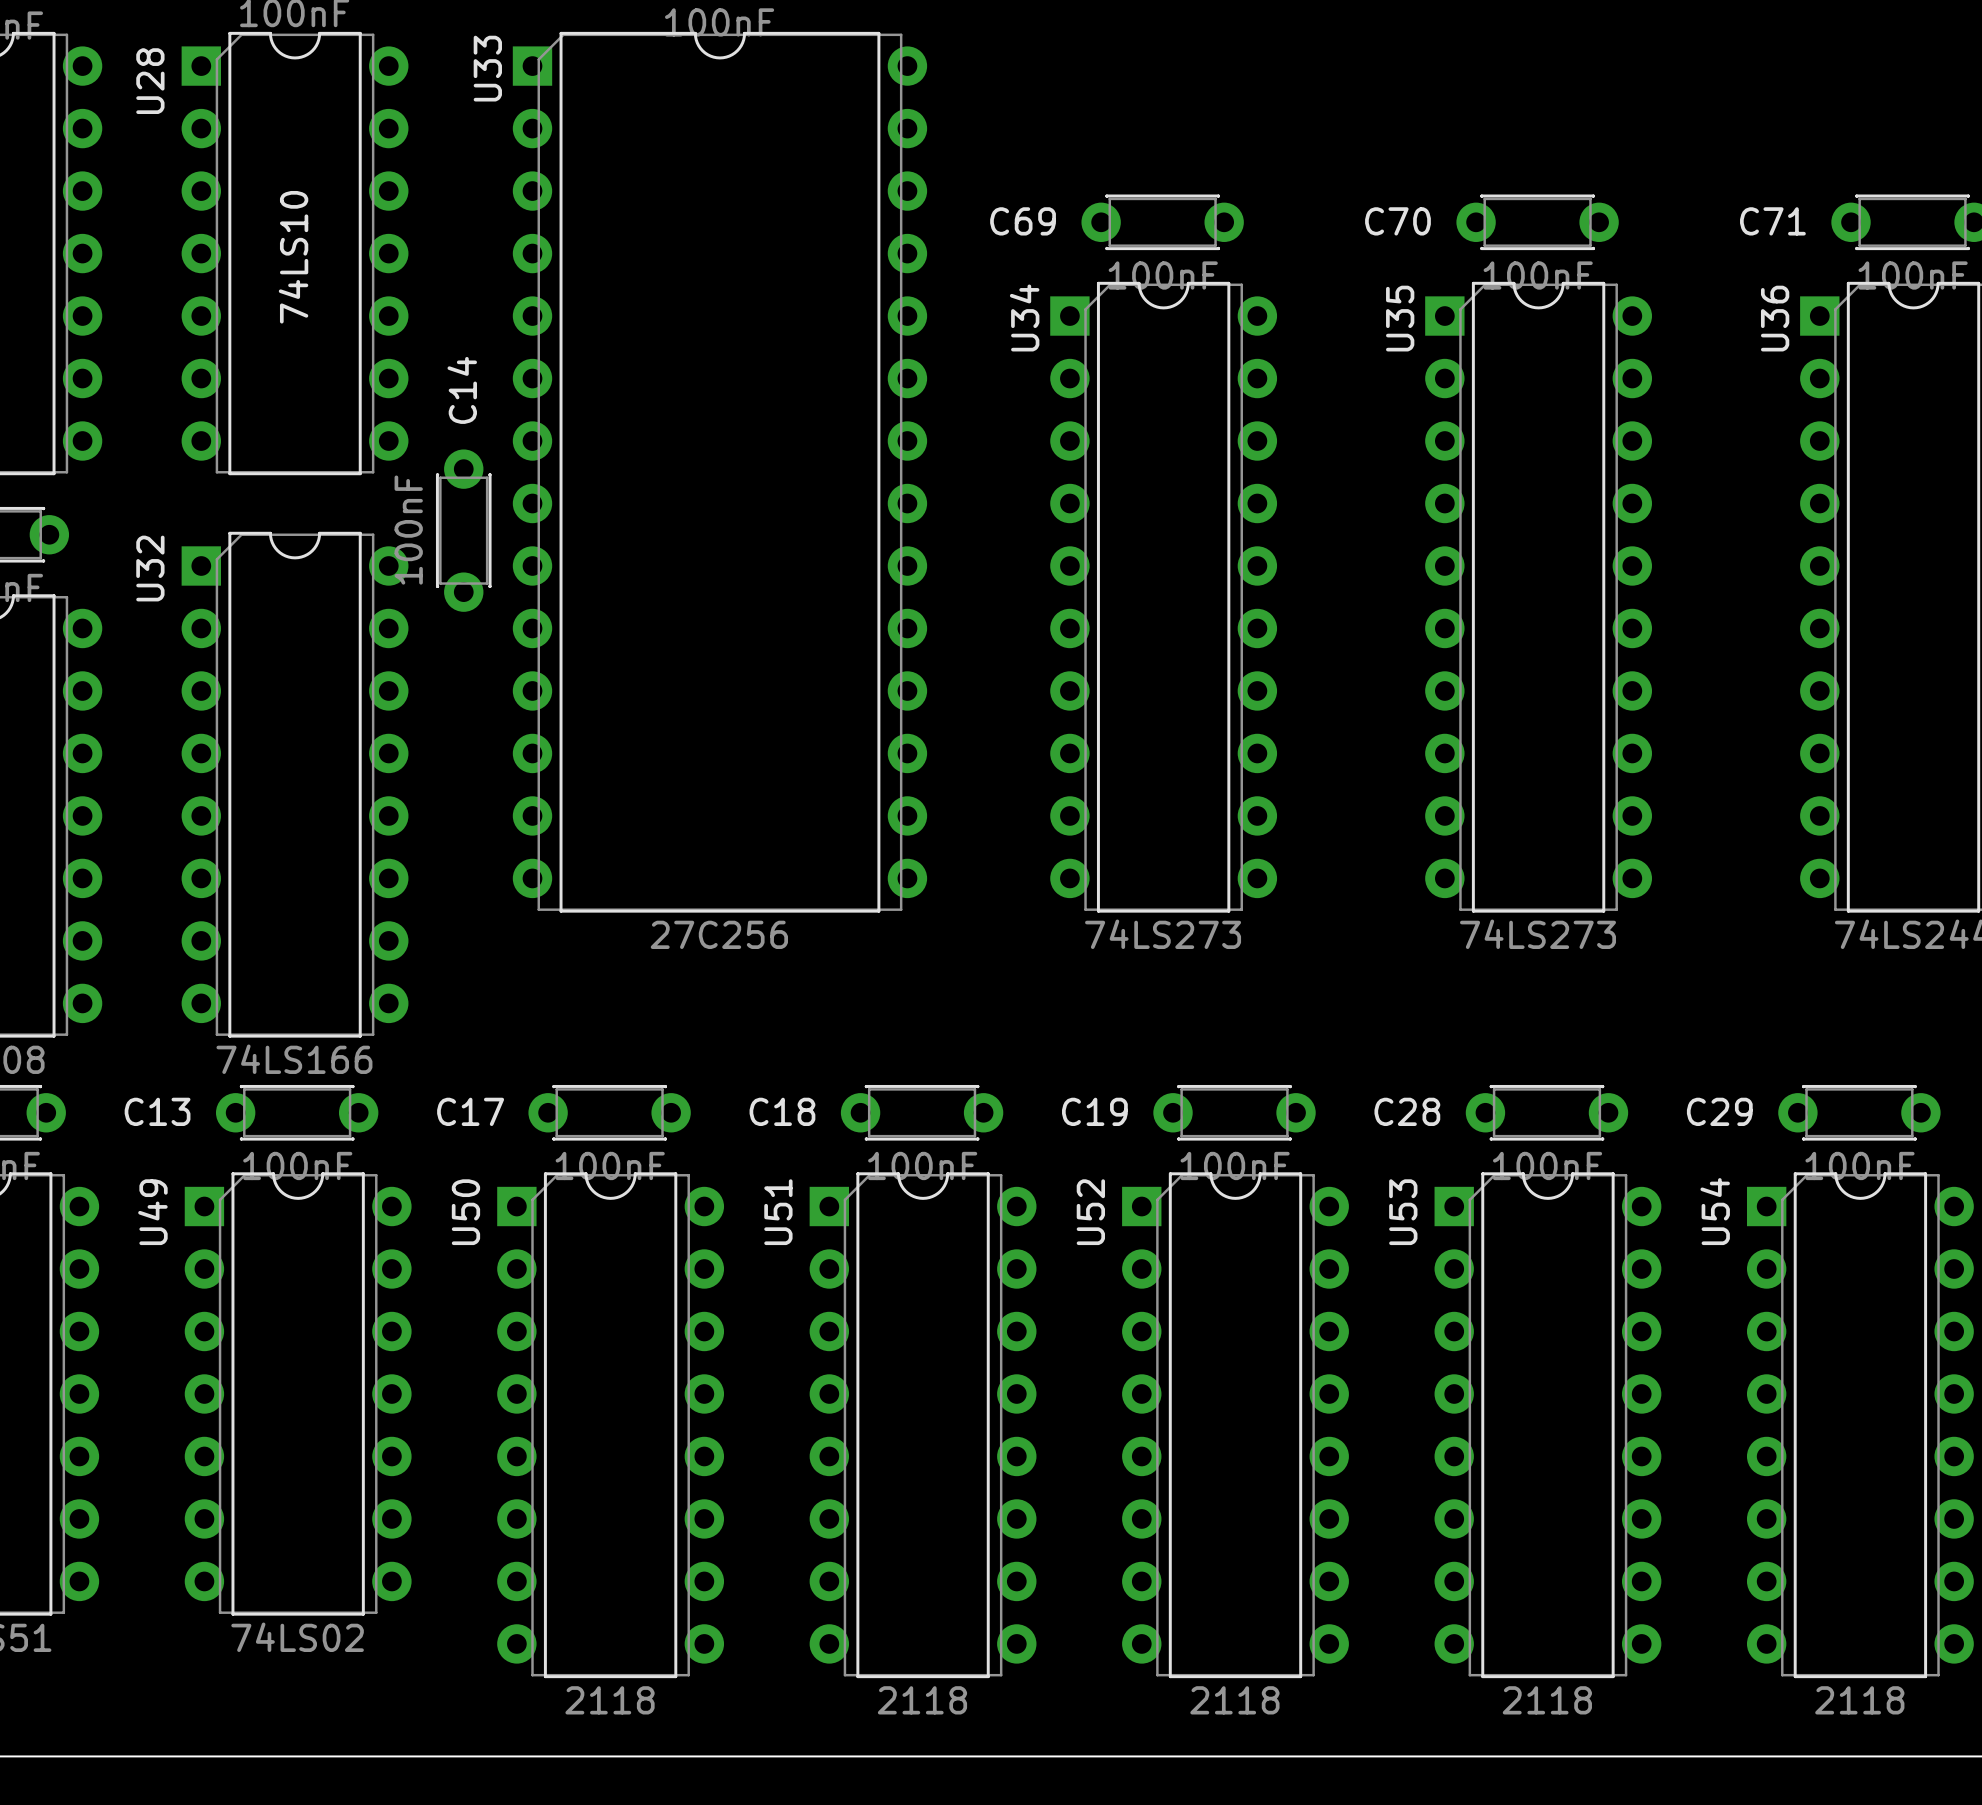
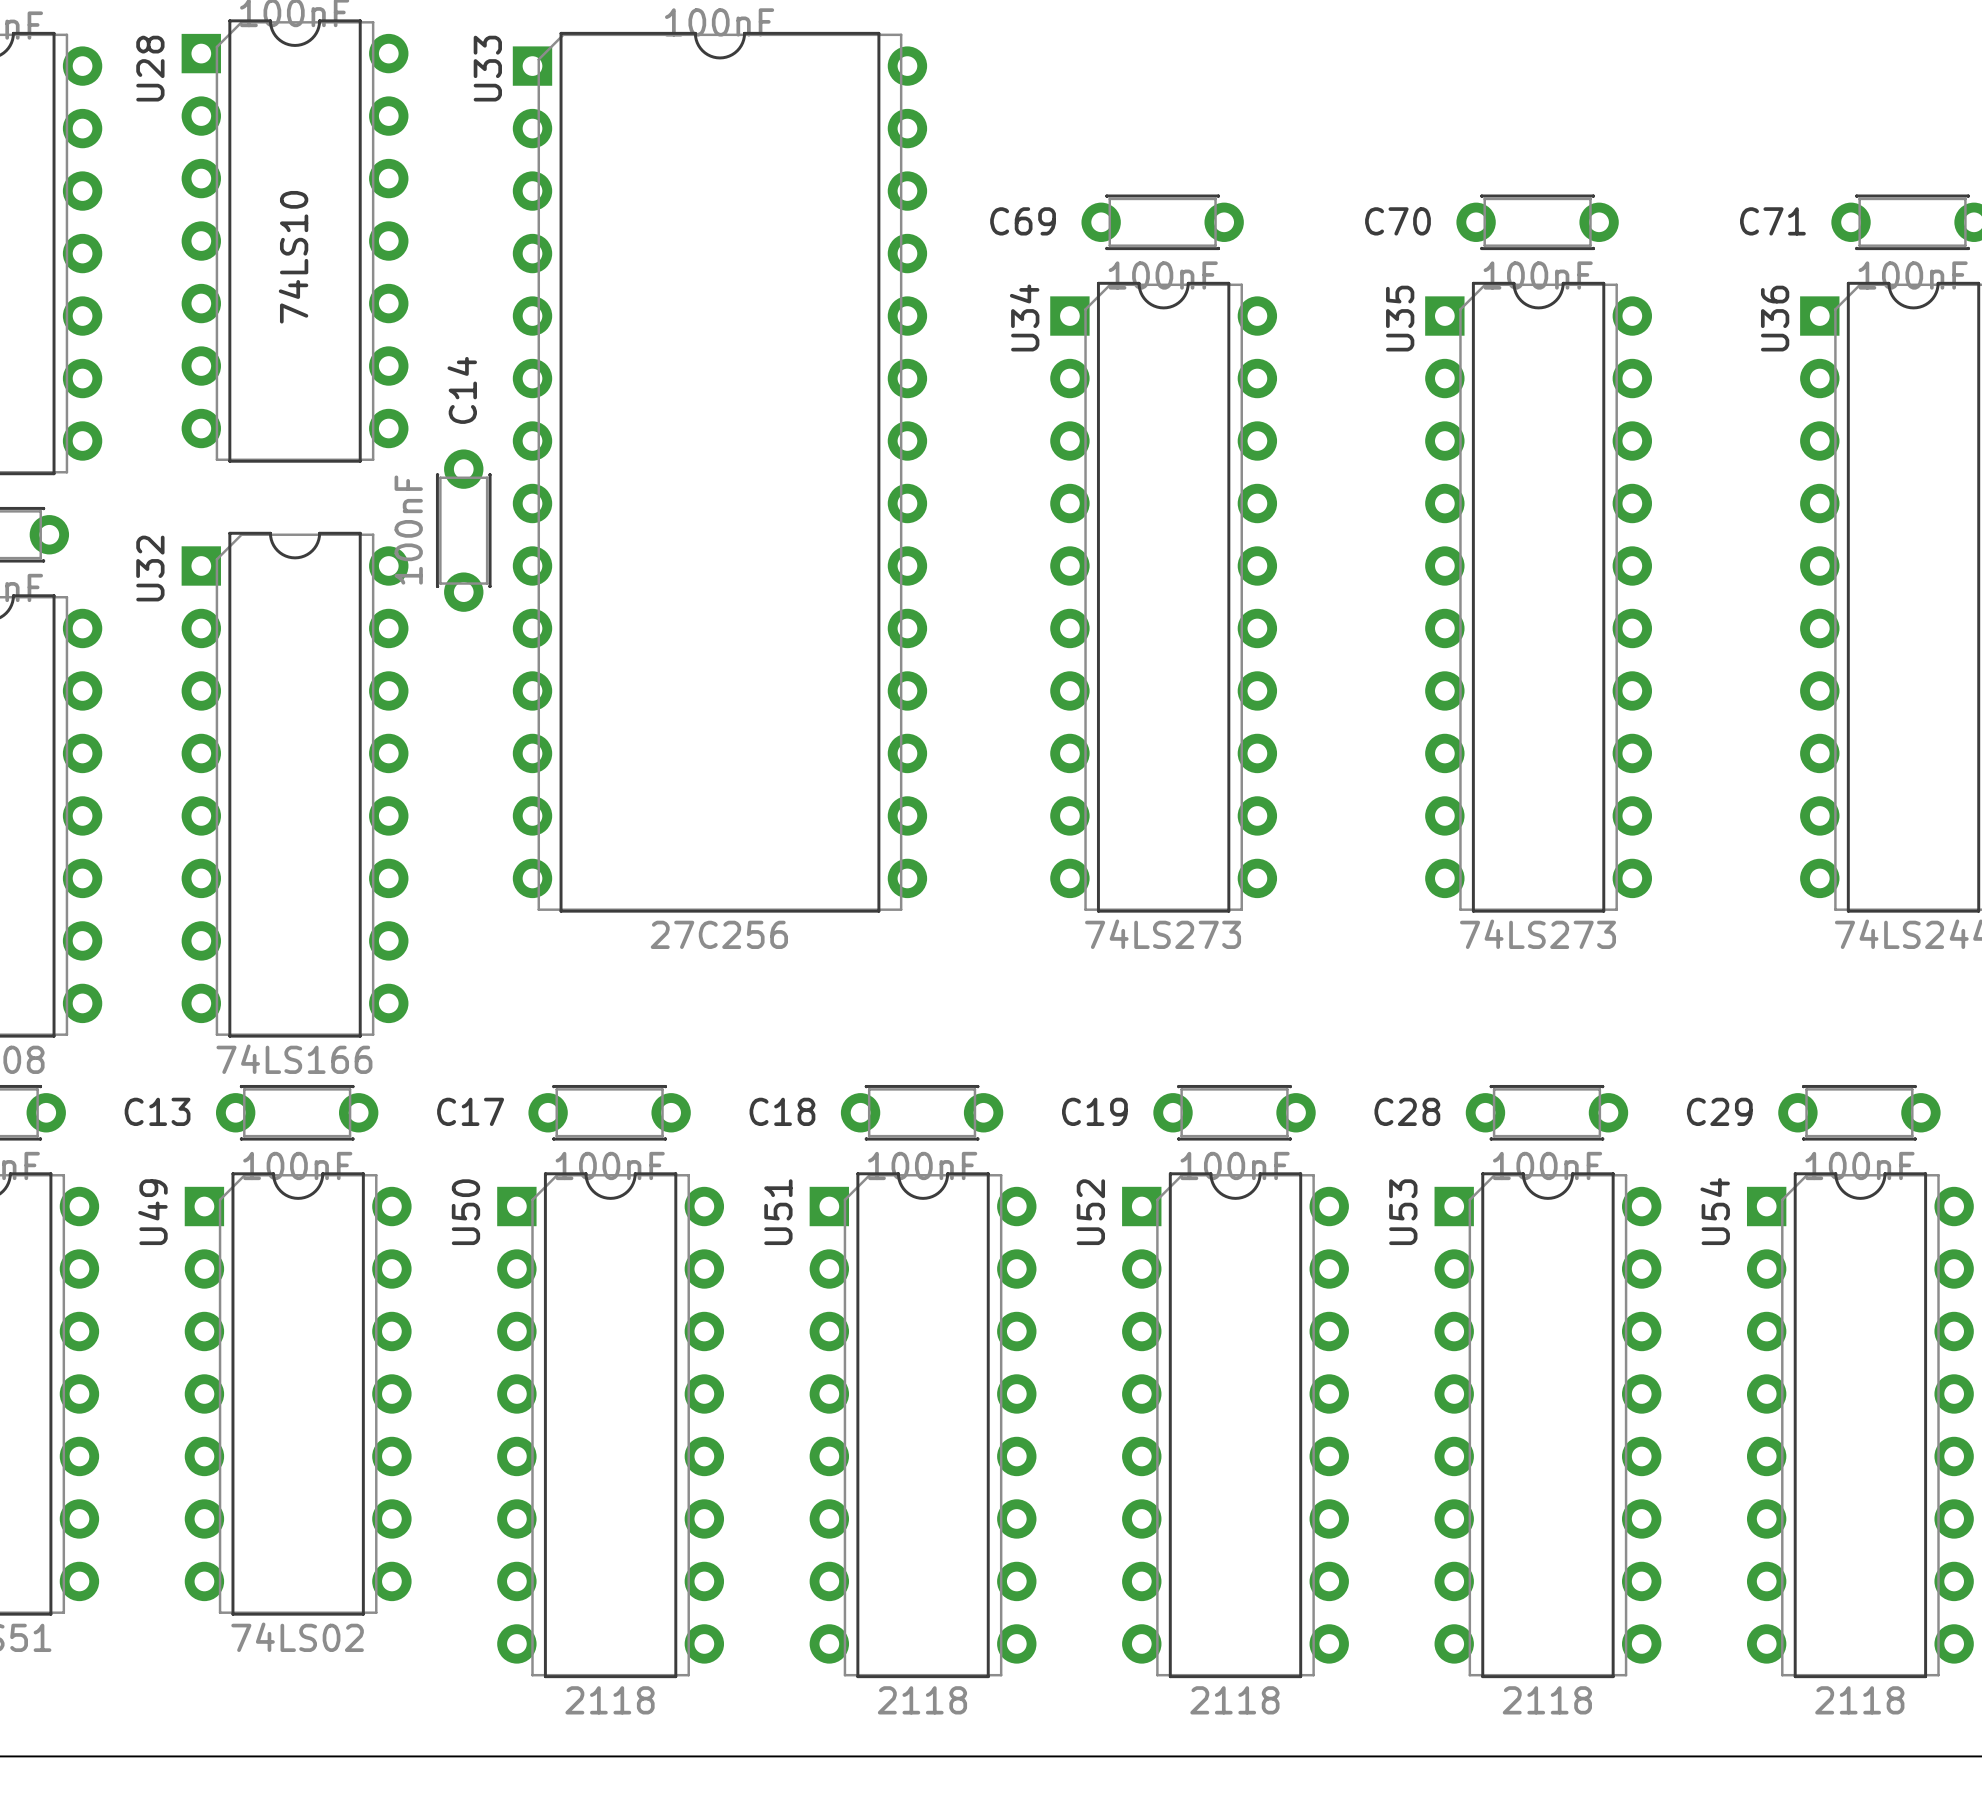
U28 position: (295, 253) -> (295, 241)

